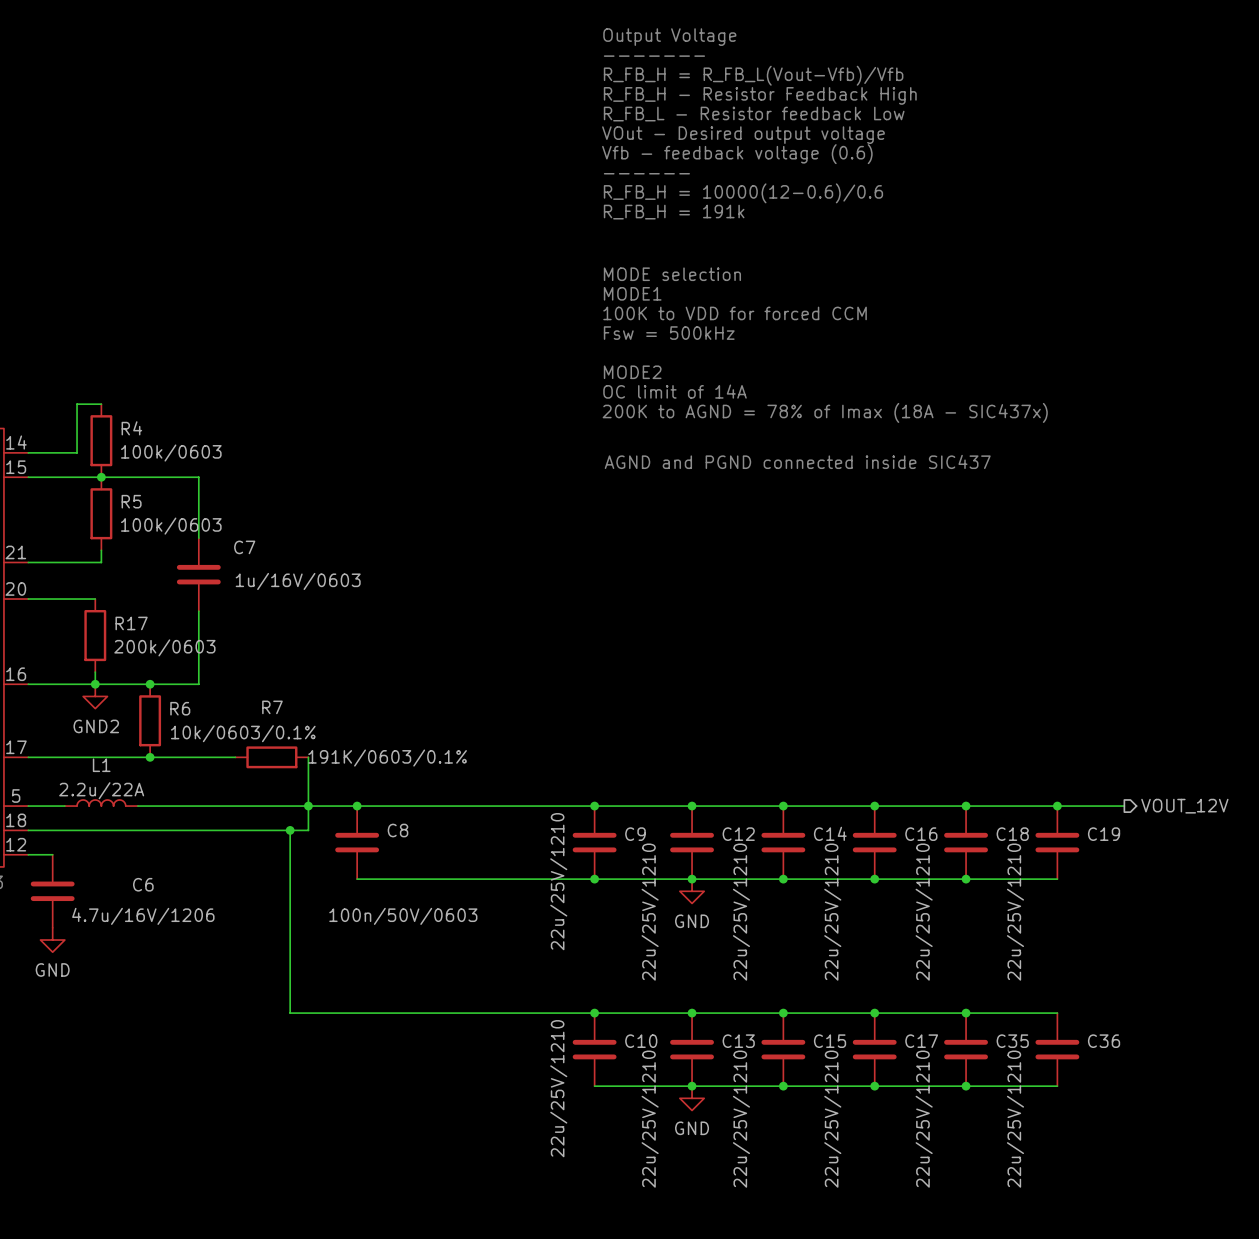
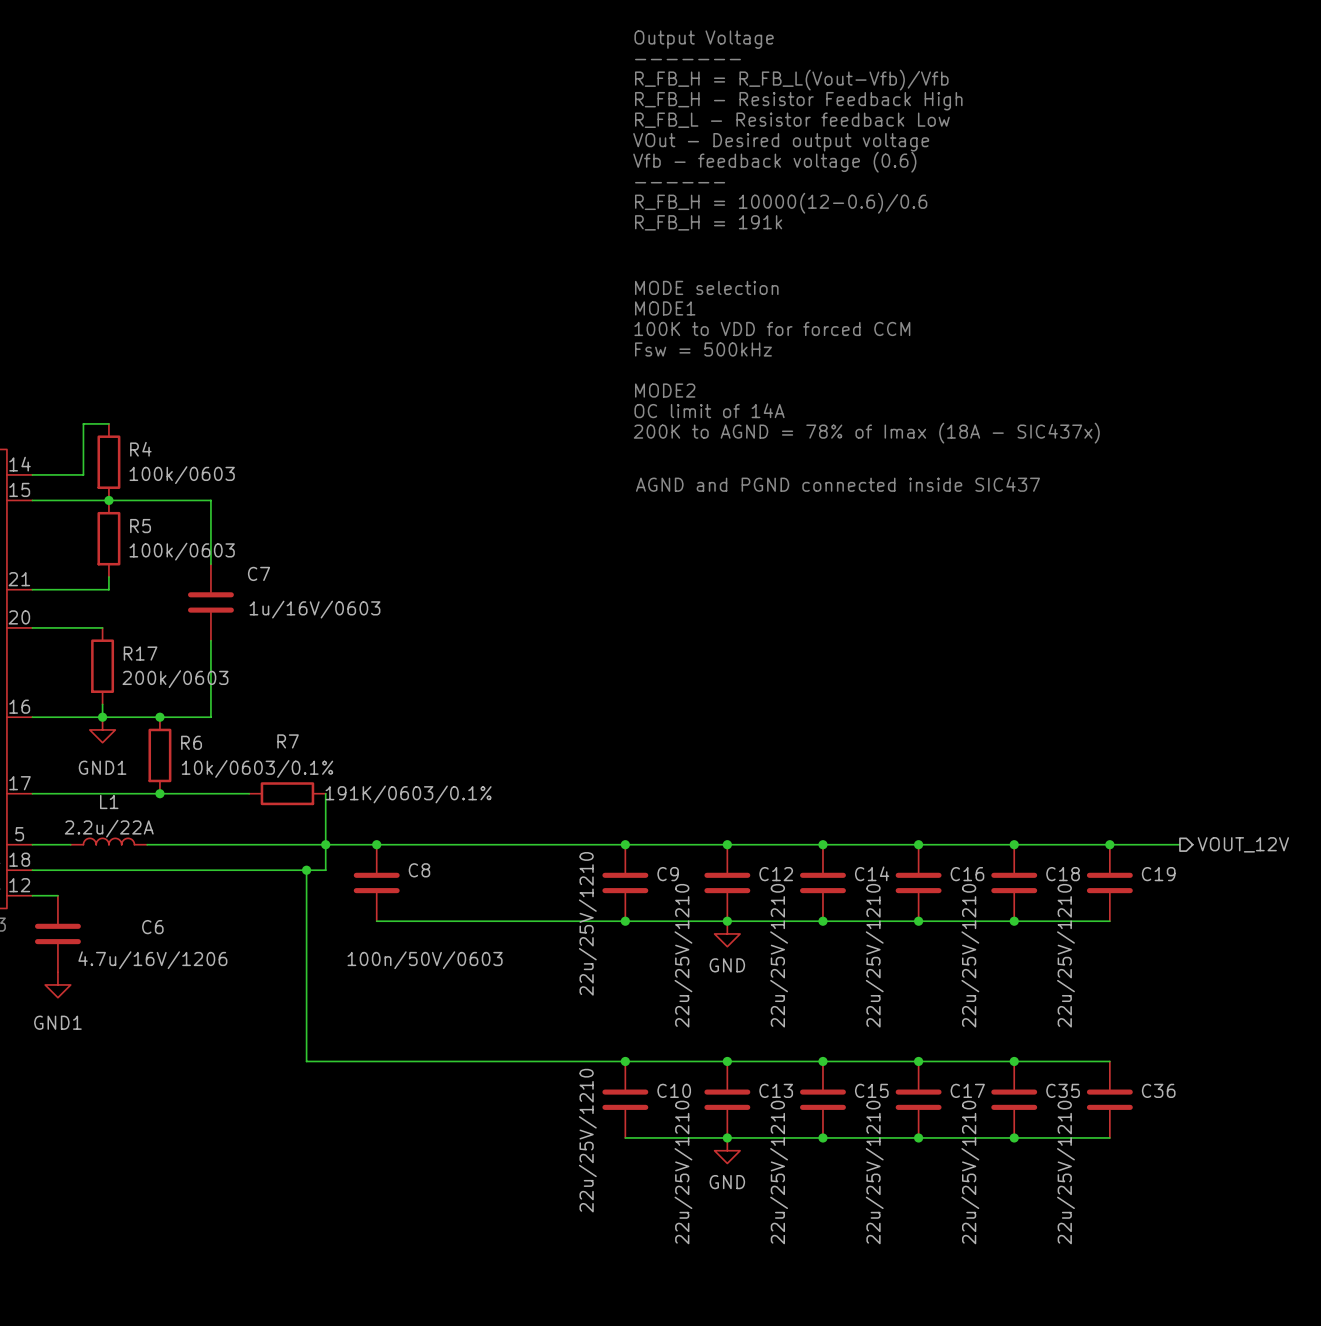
power symbol: GND2 (95, 696) -> GND1 (102, 729)
power symbol: GND (52, 940) -> GND1 (57, 984)

